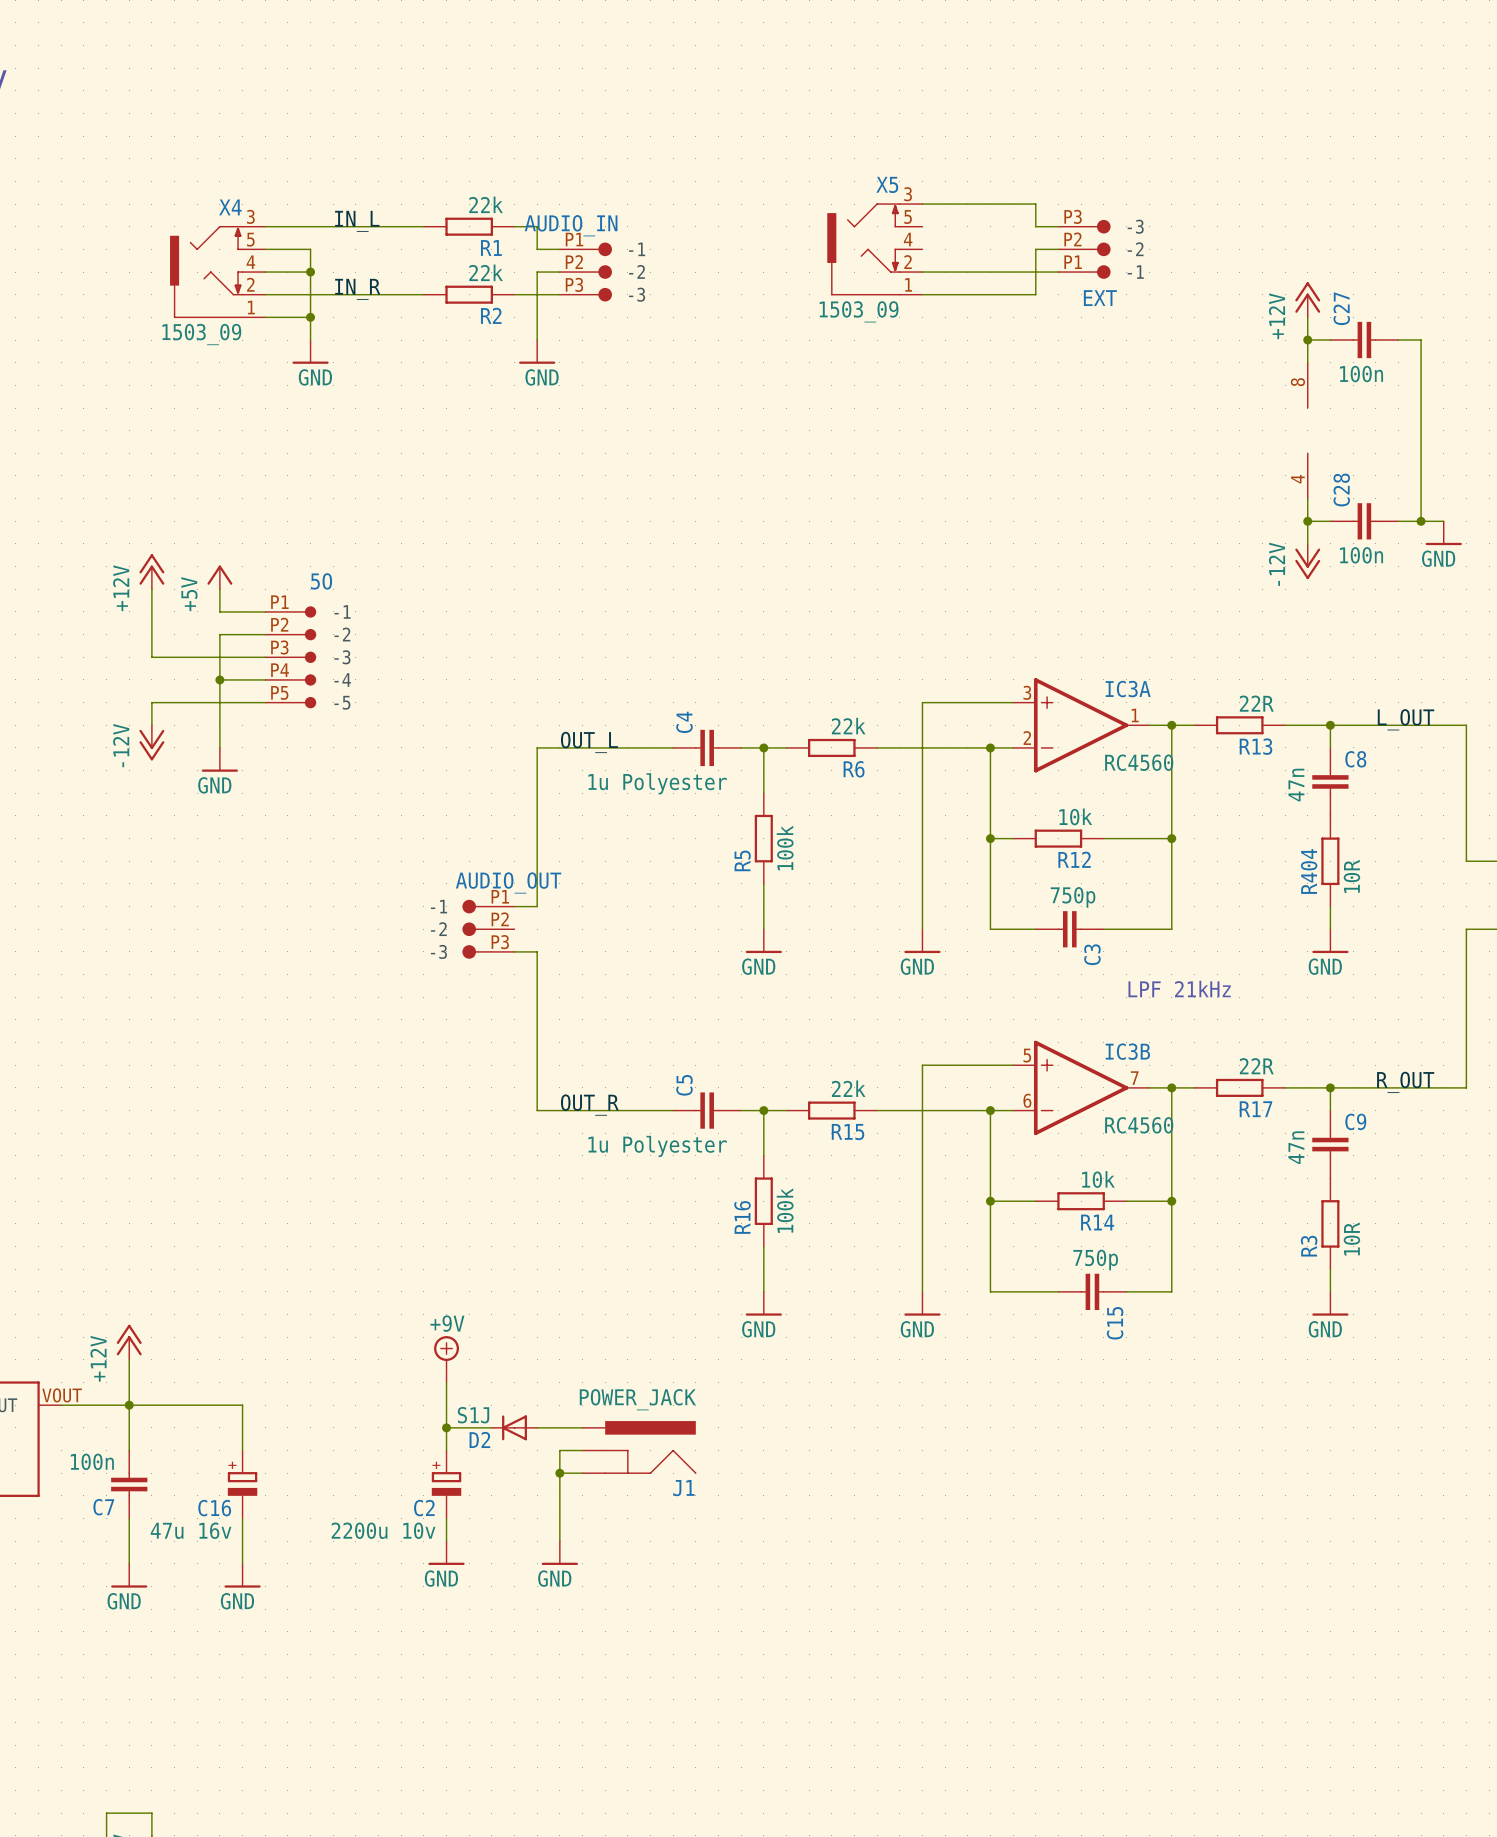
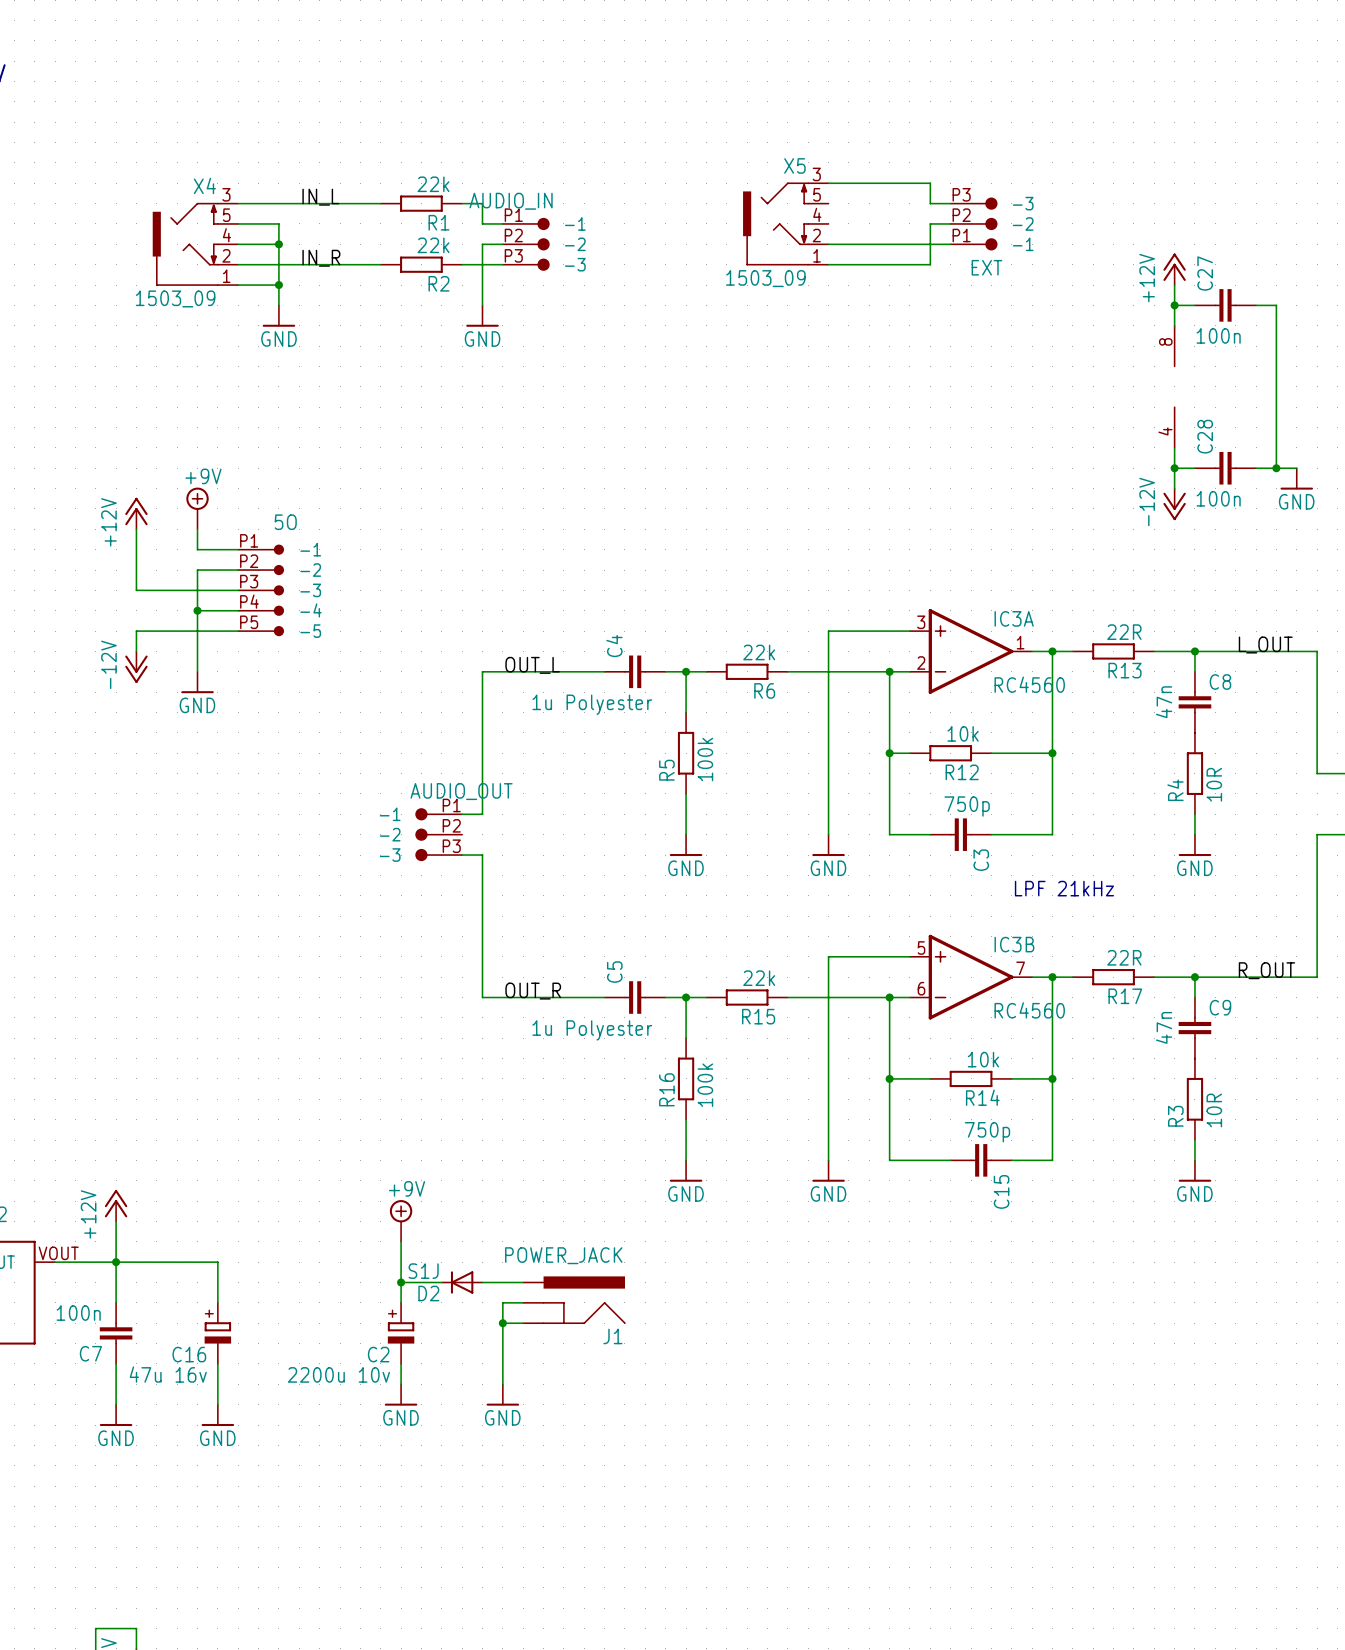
power symbol: none -> +9V (197, 508)
power symbol: +5V (219, 577) -> none
R404 name: R404 (1309, 871) -> R4 (1175, 790)

